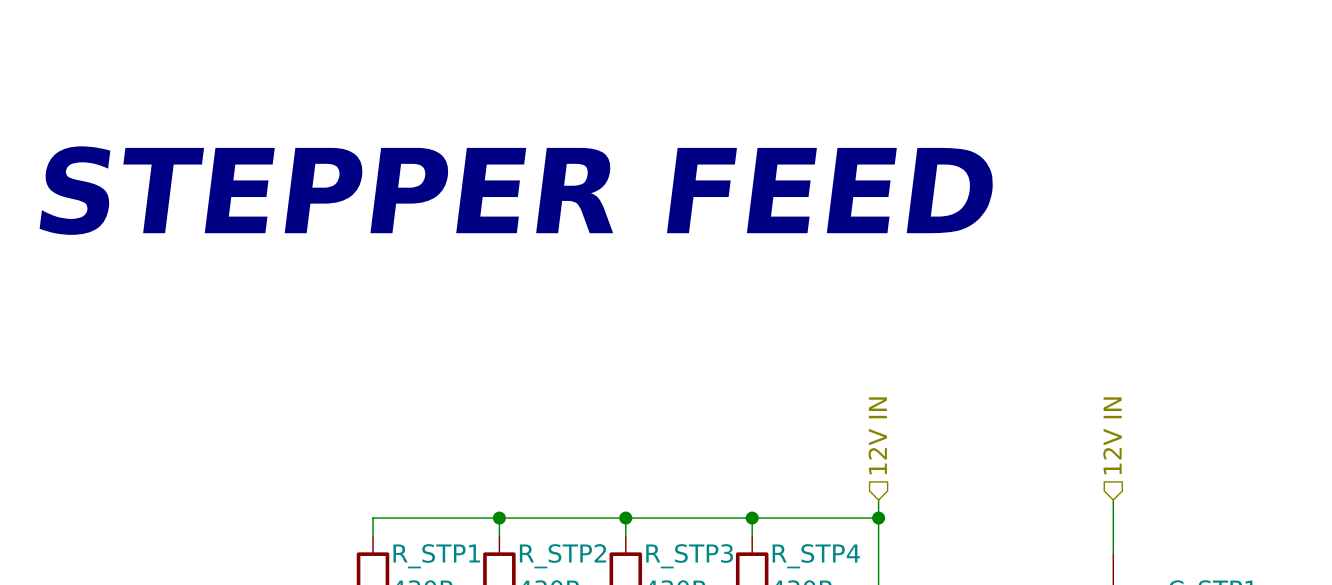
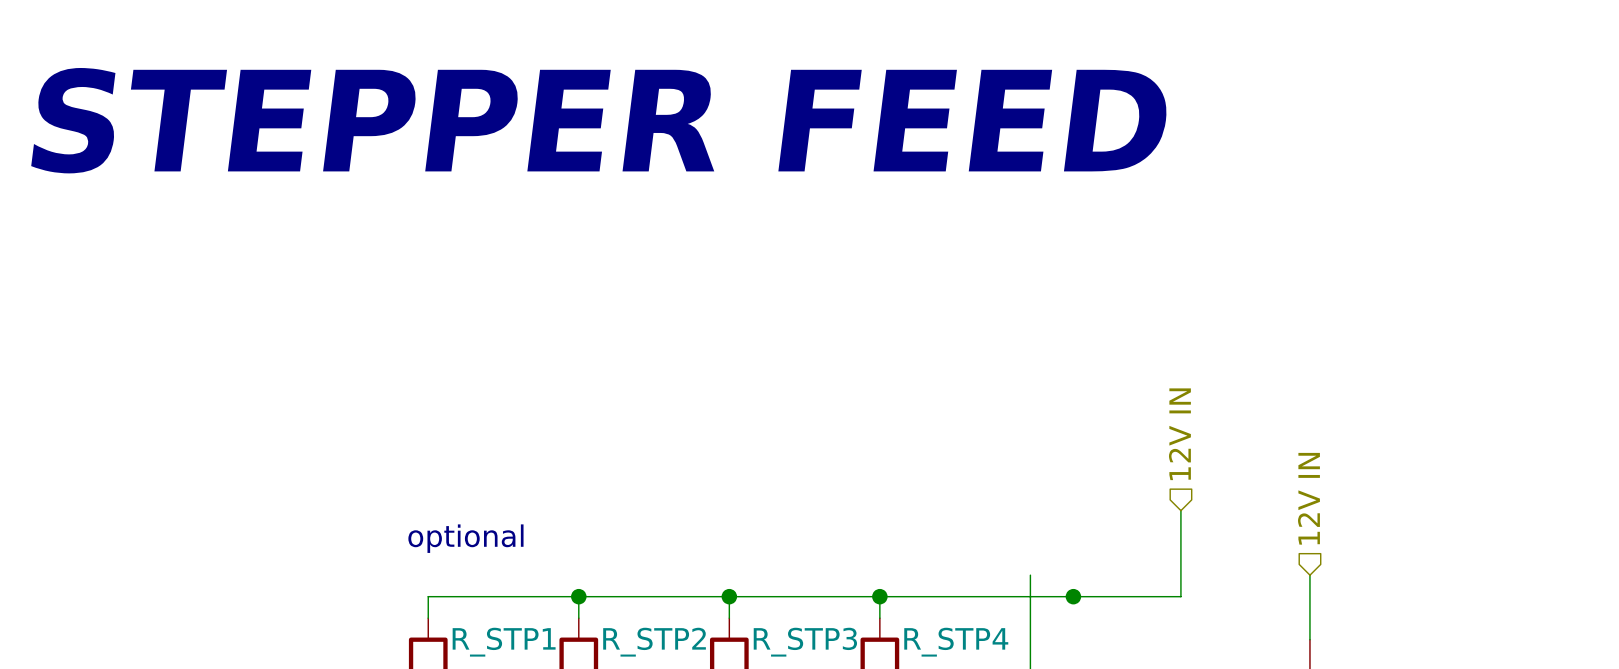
text position: STEPPER FEED (516, 190) -> STEPPER FEED (599, 120)
hierarchical label position: 12V IN (877, 435) -> 12V IN (1179, 434)
wire: none -> (1180, 510) (1180, 596) (1030, 596)
text: none -> optional (465, 538)
junction position: (878, 518) -> (1073, 596)

